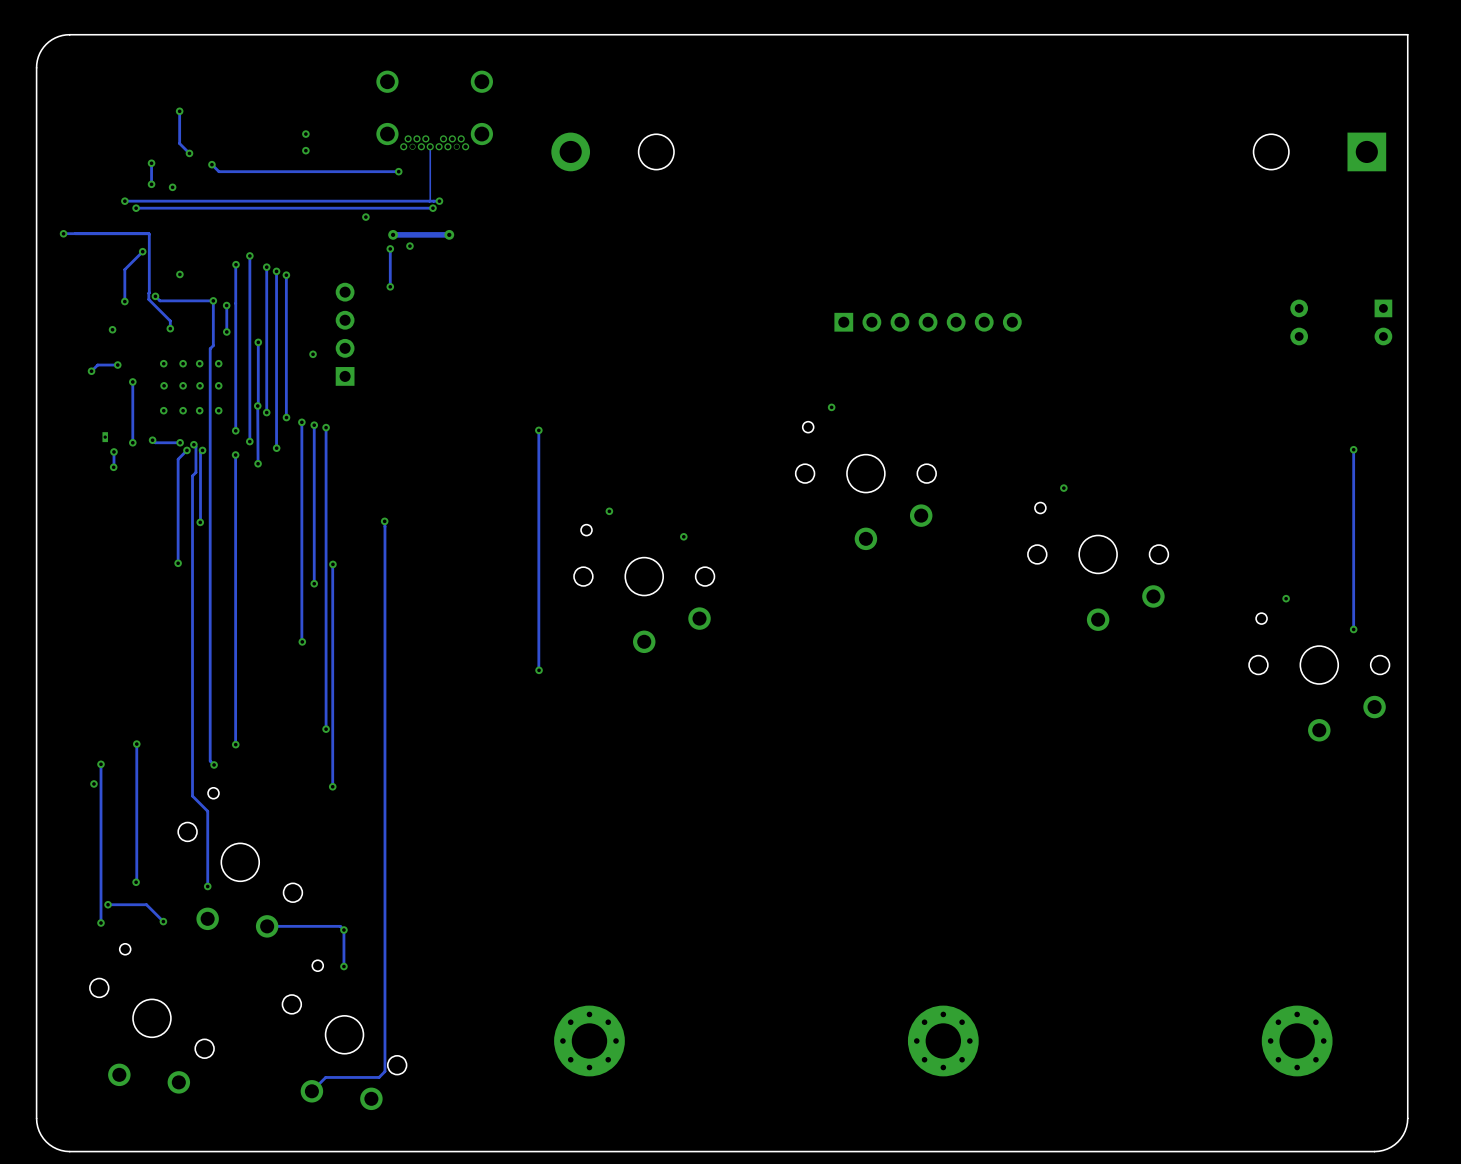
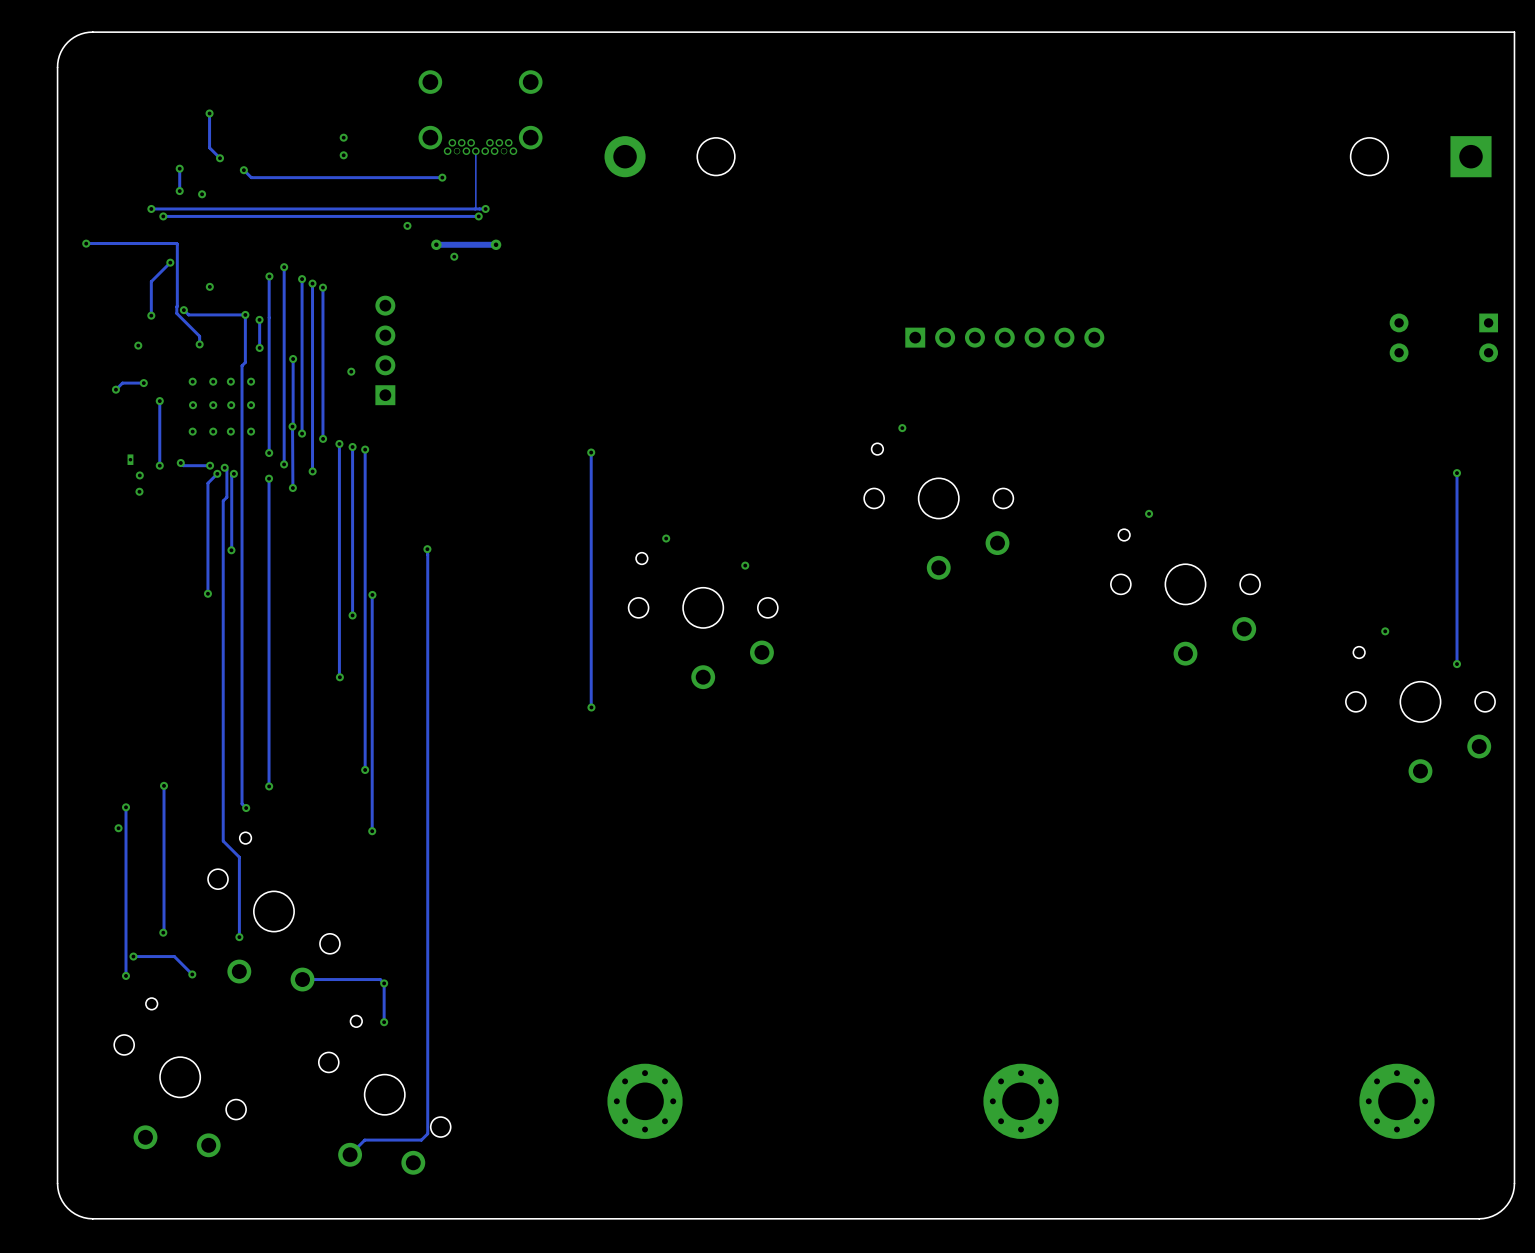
track: (390, 248) (390, 286) -> none
via: (390, 248) -> none
via: (390, 286) -> none
track: (113, 451) (113, 467) -> none

